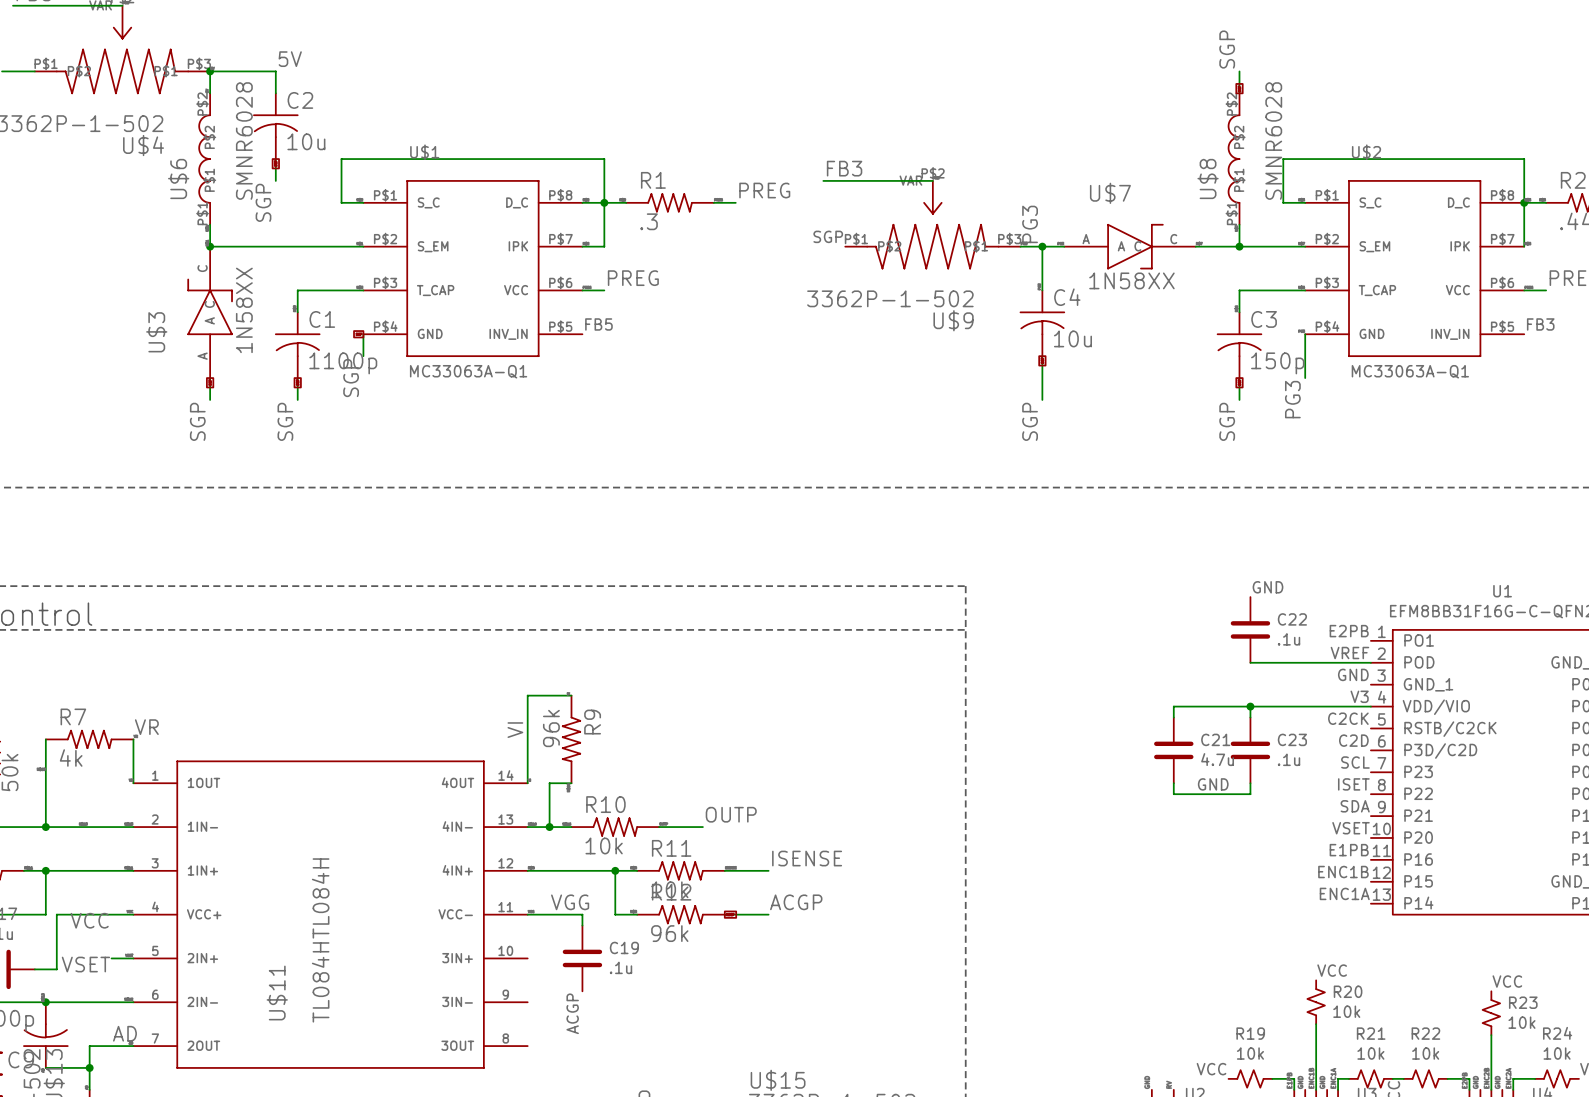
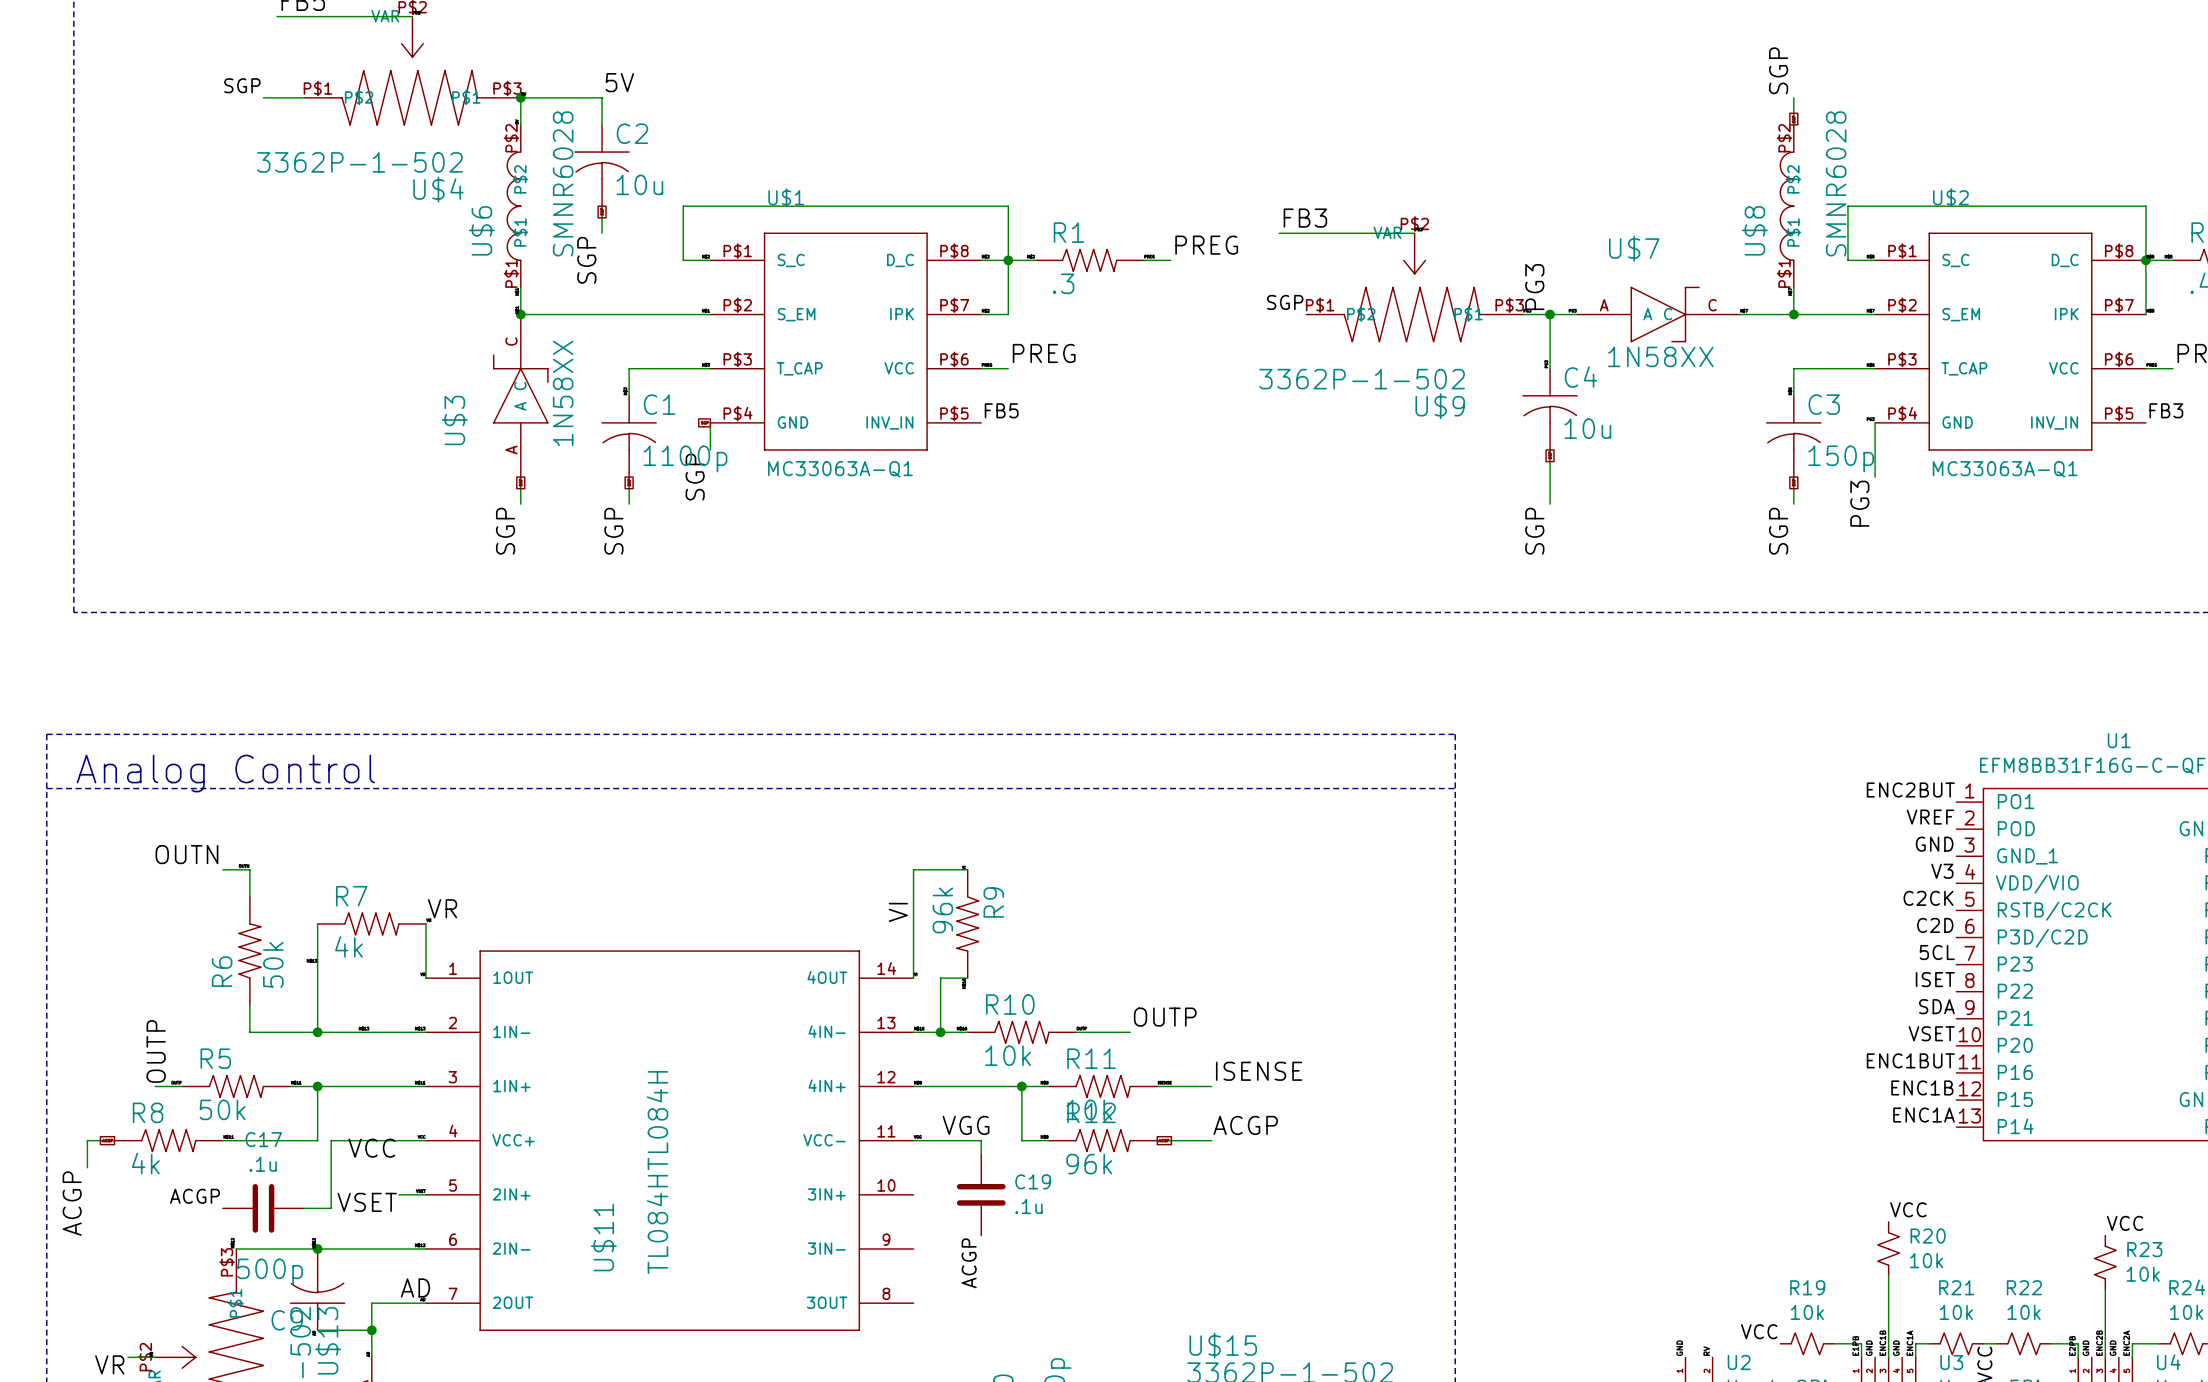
label: GND (1267, 587) -> none
C22: .1u (1250, 629) -> none
label: E2PB (1349, 631) -> ENC2BUT (1910, 790)
wire: (1250, 662) (1370, 662) -> none
wire: (1250, 706) (1250, 717) -> none
junction: (1250, 706) -> none
wire: (1370, 706) (1173, 706) (1173, 717) -> none
C21: 4.7u (1173, 750) -> none
C23: .1u (1250, 750) -> none
label: SCL (1355, 762) -> 5CL (1937, 952)
wire: (1173, 783) (1173, 794) (1250, 794) (1250, 783) -> none
label: GND (1213, 784) -> none
label: E1PB (1349, 850) -> ENC1BUT (1910, 1060)

